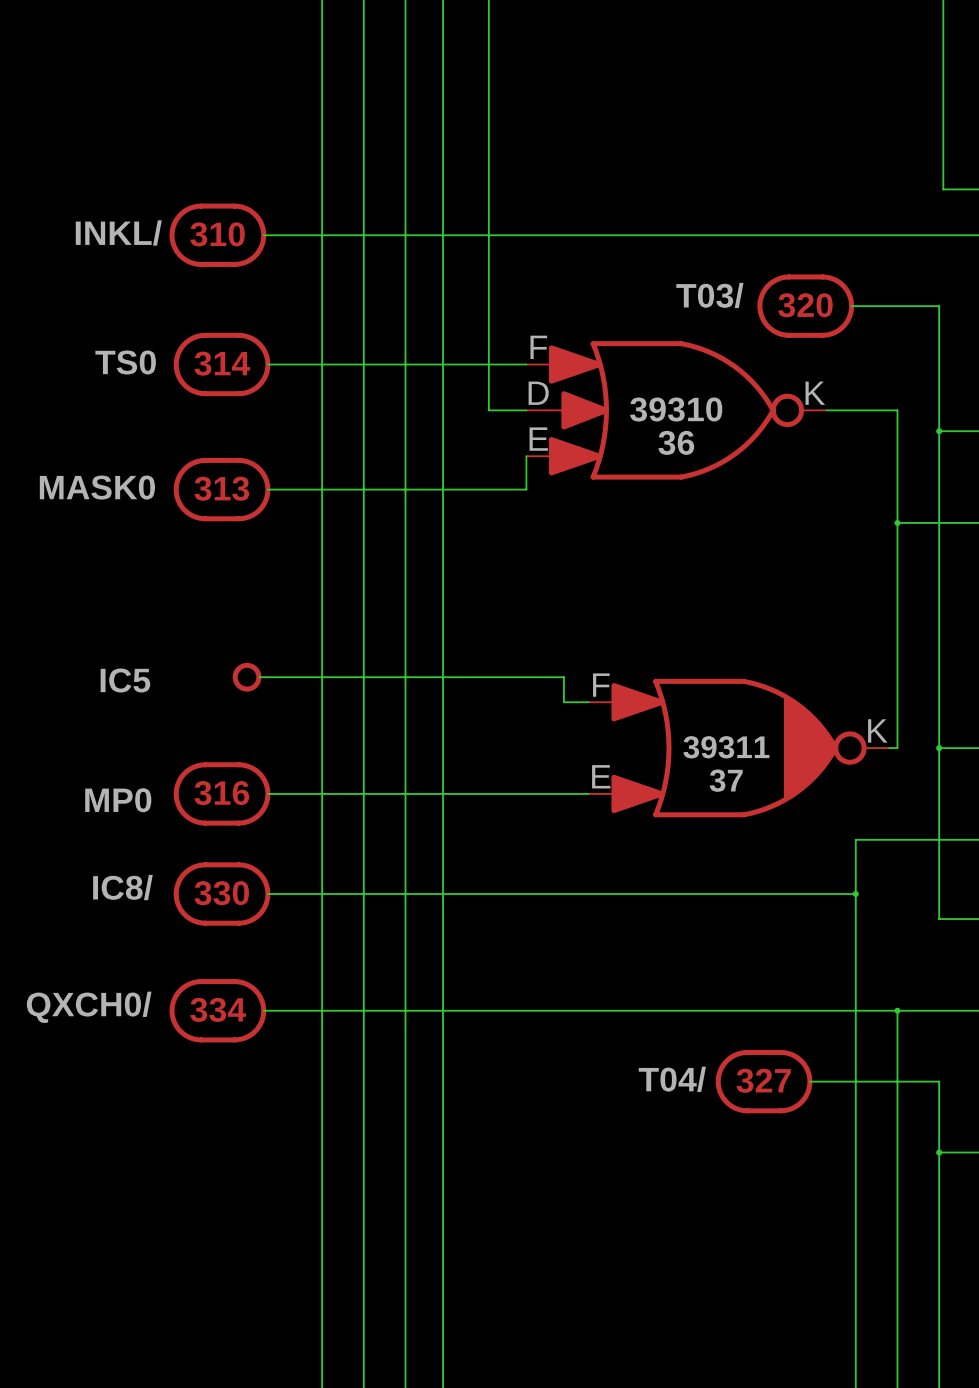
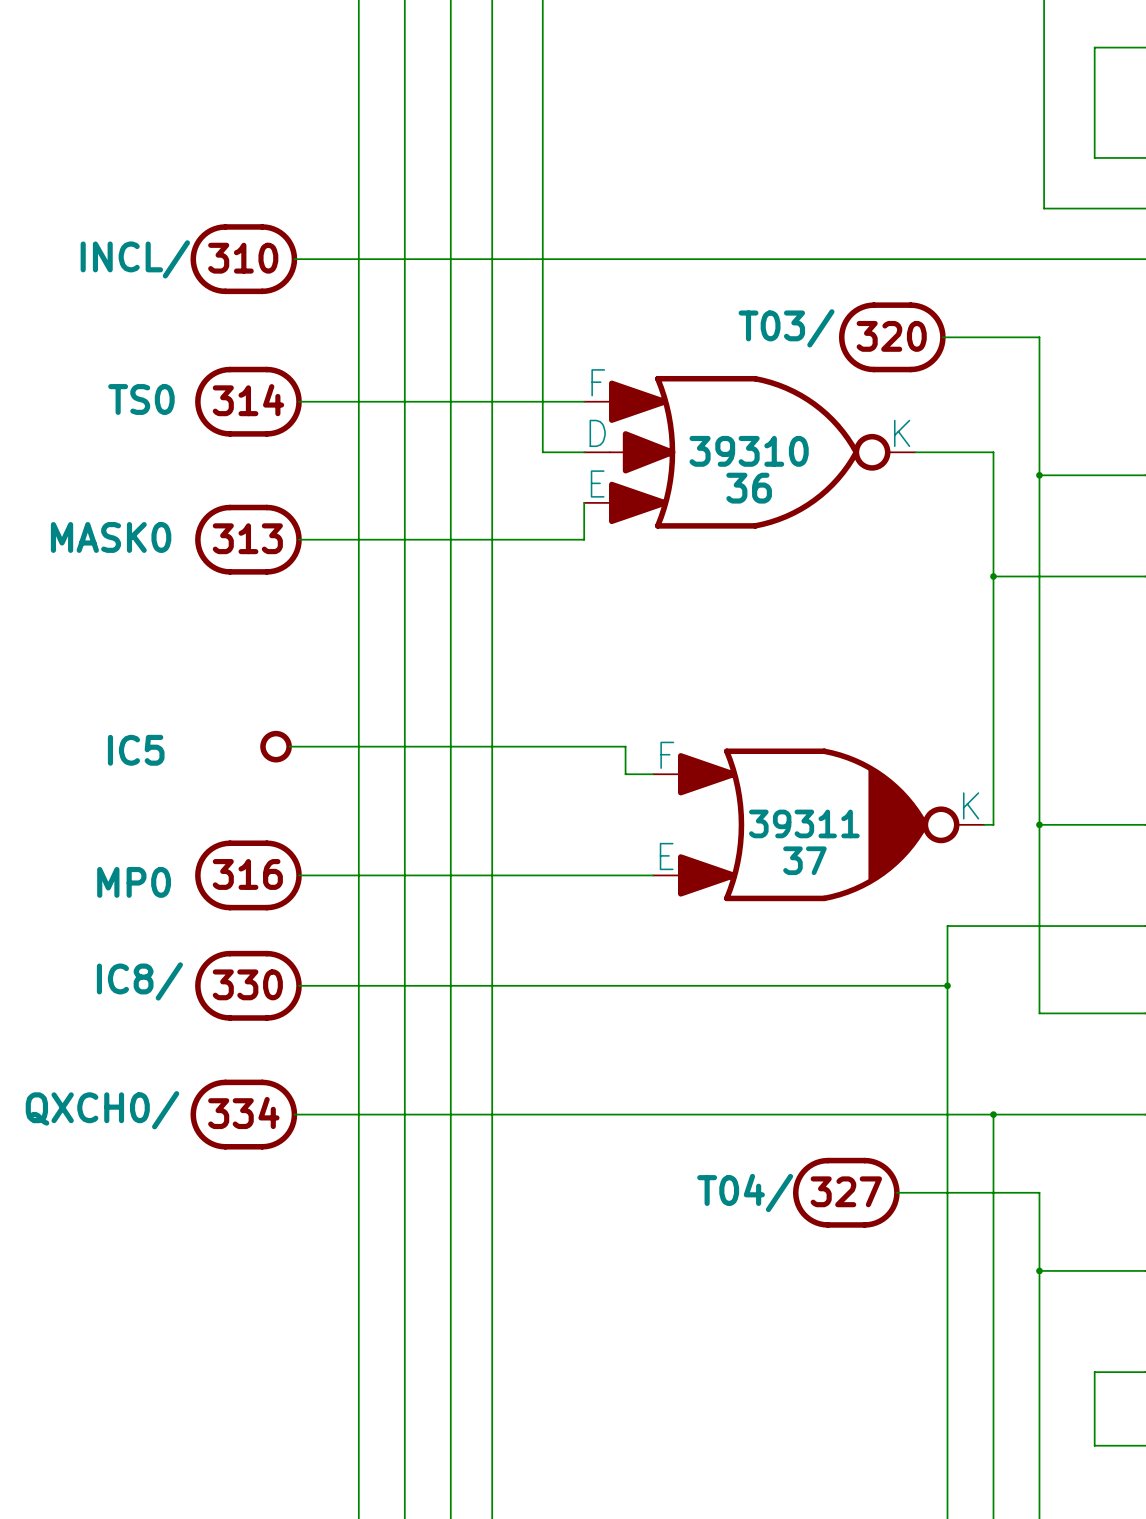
part text: INKL/ (118, 232) -> INCL/ (135, 259)

